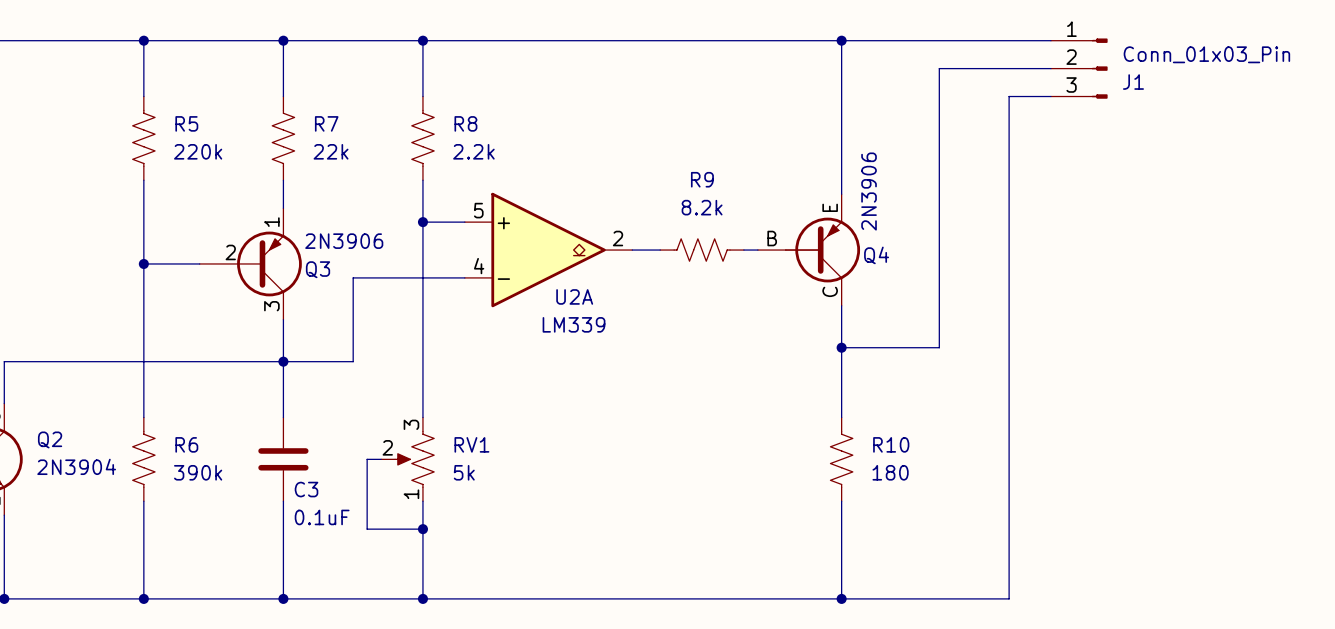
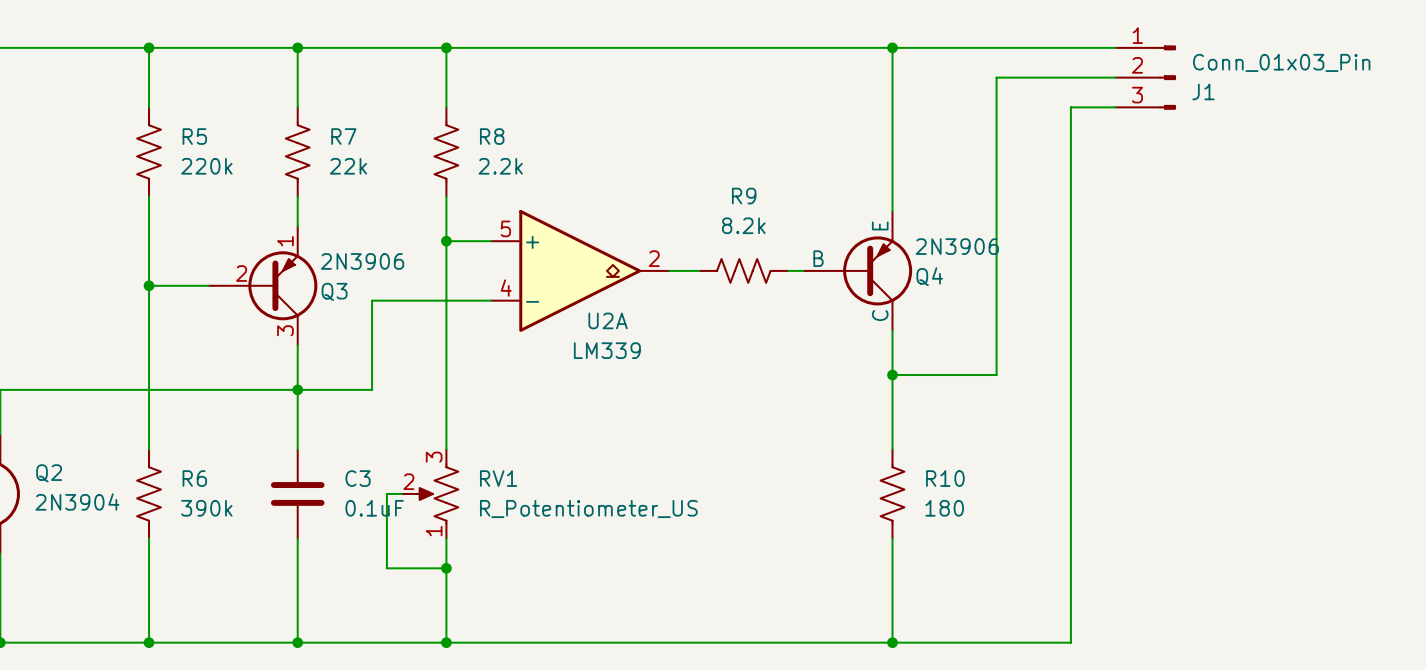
Q4 value rotation: 0° (869, 191) -> 90° clockwise (957, 246)
RV1 value: 5k (464, 472) -> R_Potentiometer_US (588, 508)
C3 name position: C3 (306, 489) -> C3 (358, 478)
C3 value position: 0.1uF (322, 517) -> 0.1uF (374, 508)

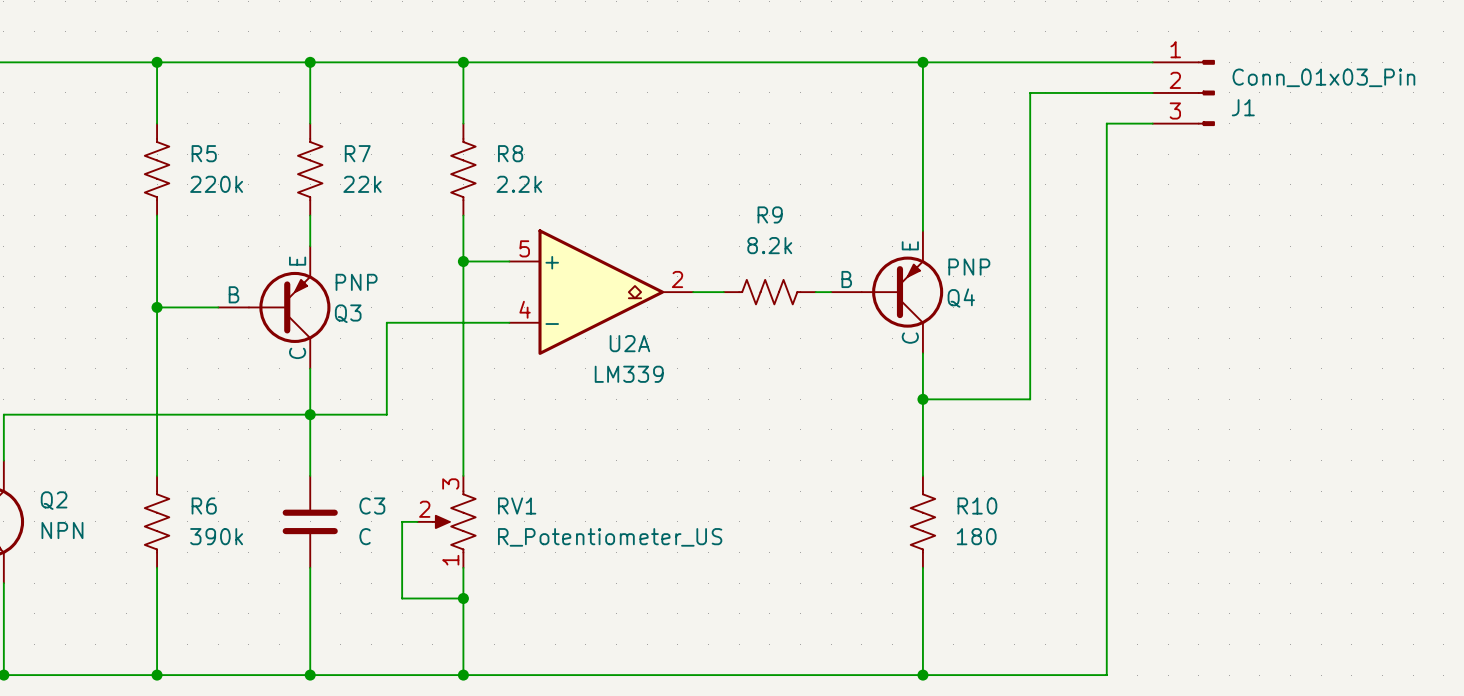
Q3 symbol: [208, 226, 318, 346] -> [218, 246, 331, 369]
Q4 value: 2N3906 (957, 246) -> PNP (969, 267)
Q3 value: 2N3906 (362, 261) -> PNP (356, 282)
Q2 value: 2N3904 (77, 501) -> NPN (62, 530)
C3 value: 0.1uF (374, 508) -> C (365, 536)

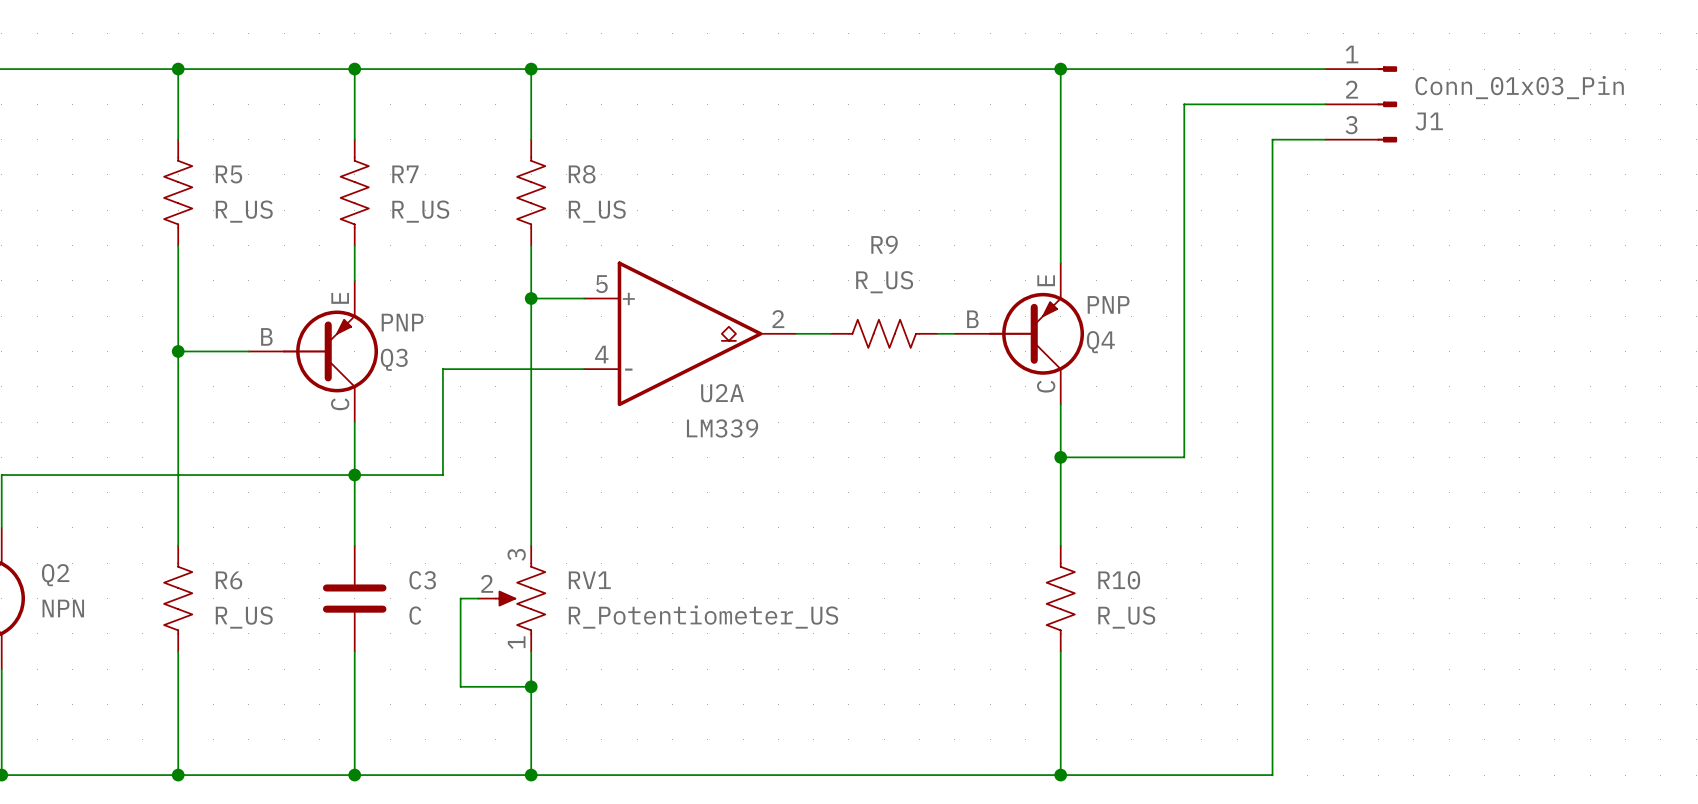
R5 value: 220k (216, 184) -> R_US (244, 211)
R7 value: 22k (362, 184) -> R_US (420, 211)
R8 value: 2.2k (519, 184) -> R_US (597, 211)
R9 value: 8.2k (769, 245) -> R_US (884, 282)
R6 value: 390k (216, 536) -> R_US (244, 617)
R10 value: 180 (976, 536) -> R_US (1126, 617)

